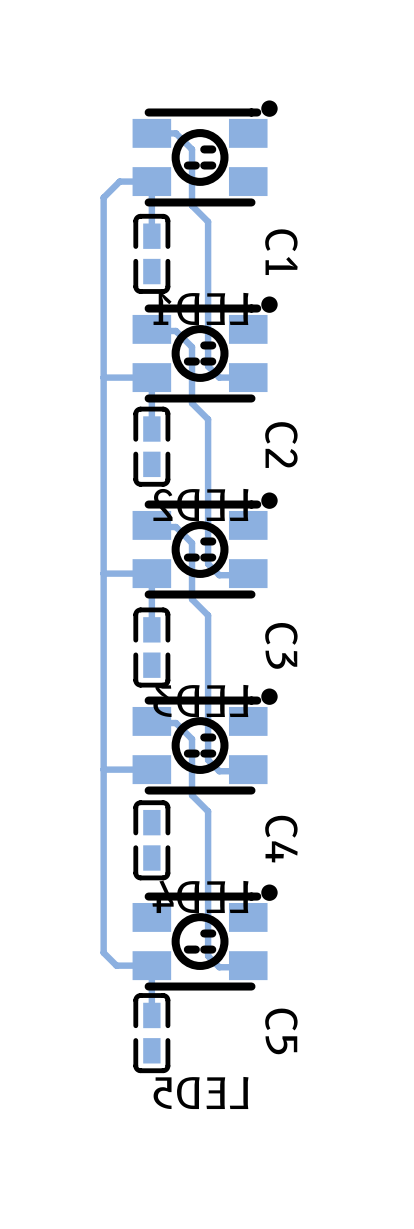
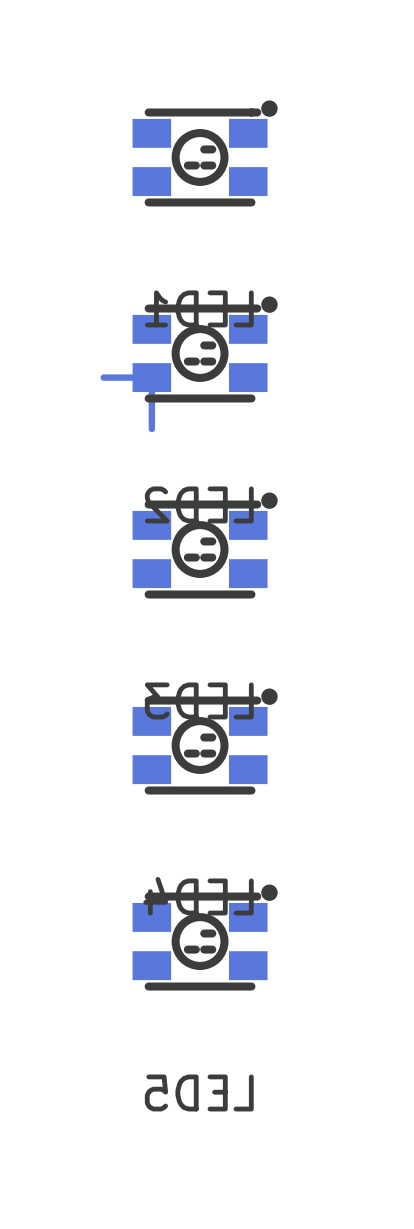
track: (151, 133) (175, 133) (192, 149) (192, 205) (208, 221) (208, 366) (219, 377) (248, 377) -> none
track: (151, 236) (151, 181) (119, 181) (103, 197) (103, 952) (116, 965) (151, 965) (151, 1015) -> none
C1: (151, 253) -> none
track: (151, 331) (175, 331) (192, 347) (192, 403) (208, 419) (208, 563) (219, 575) (248, 575) -> none
C2: (151, 446) -> none
track: (151, 527) (175, 527) (192, 543) (192, 599) (208, 615) (208, 759) (219, 771) (248, 771) -> none
track: (103, 573) (151, 573) (151, 629) -> none
C3: (151, 647) -> none
track: (151, 723) (175, 723) (192, 739) (192, 795) (208, 811) (208, 956) (219, 967) (248, 967) -> none
track: (151, 769) (103, 769) -> none
C4: (151, 840) -> none
C5: (151, 1033) -> none

